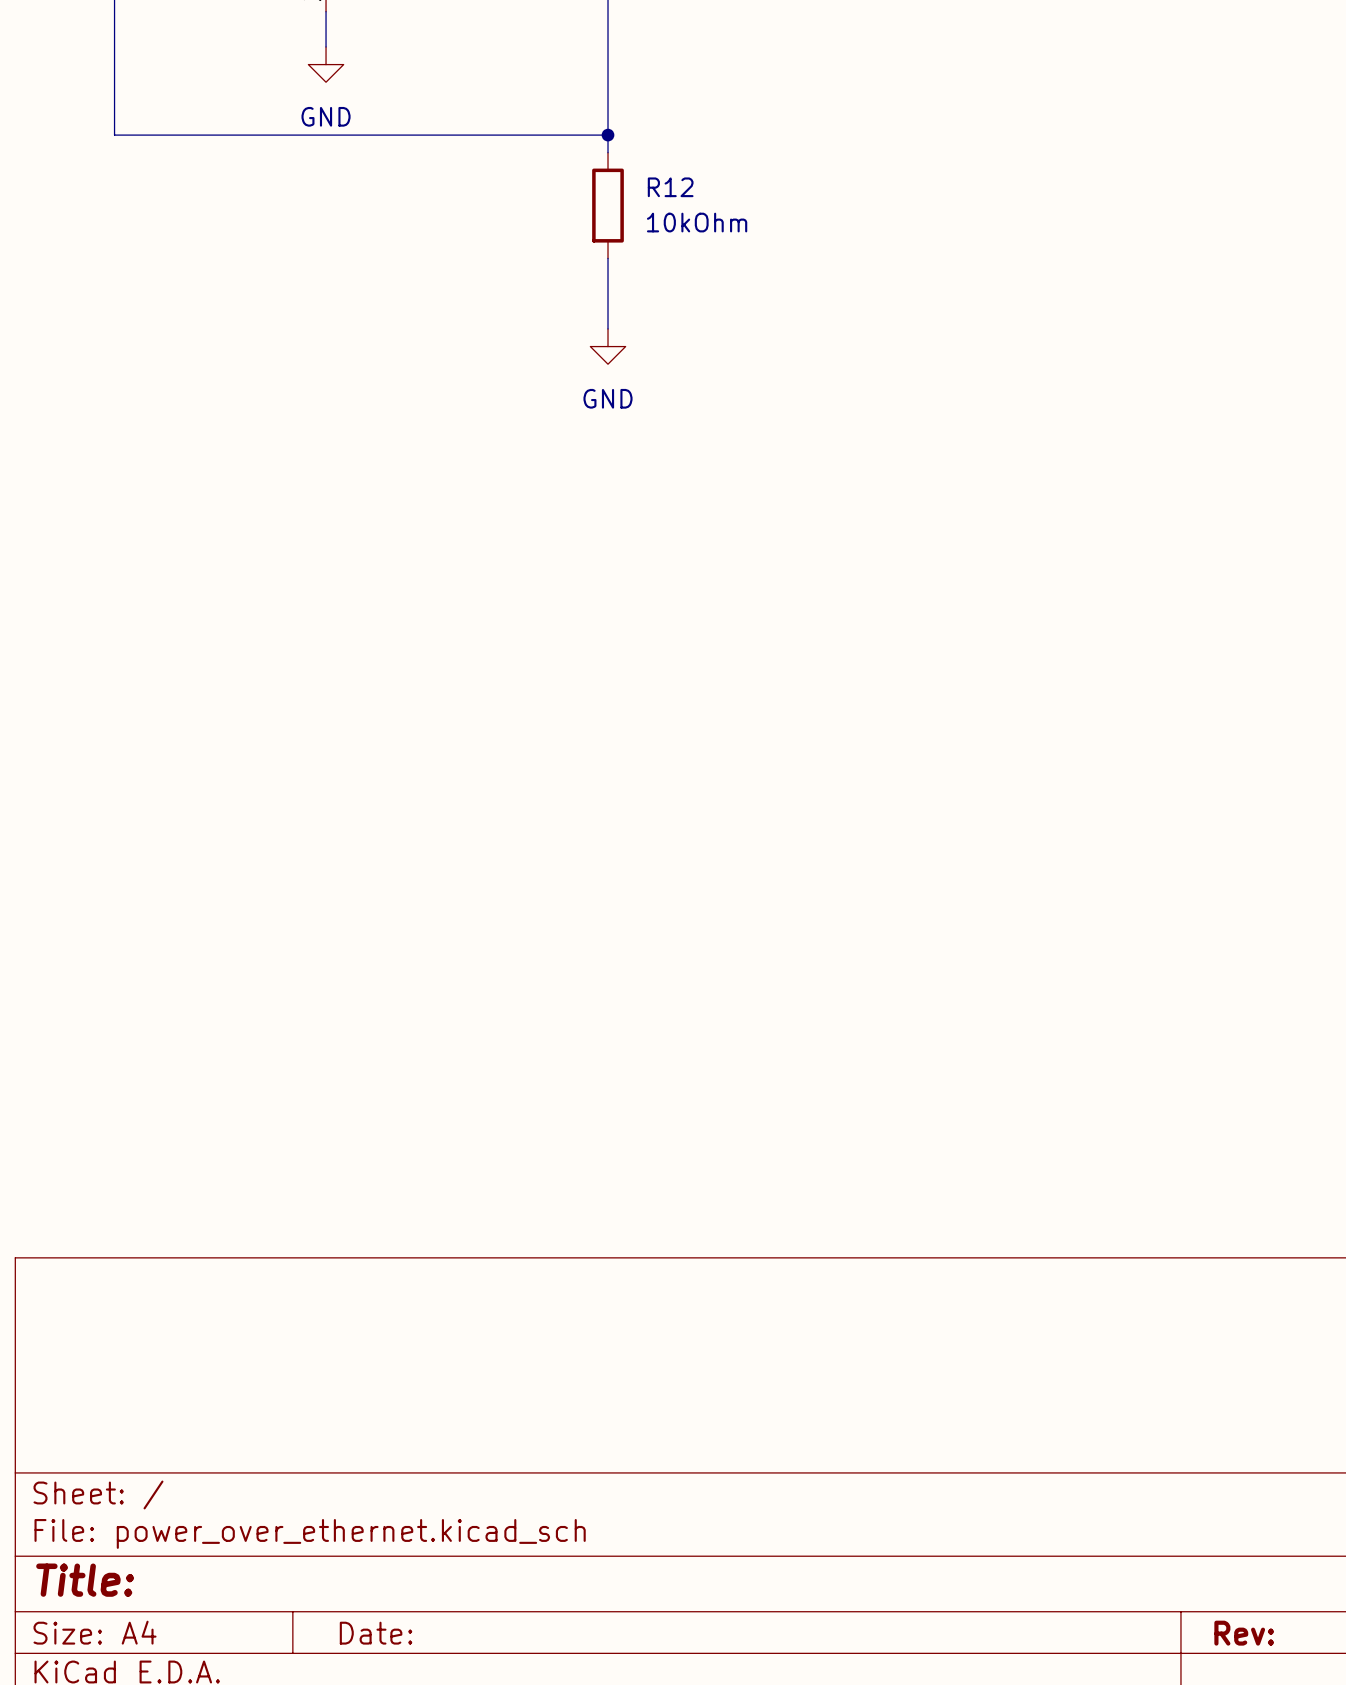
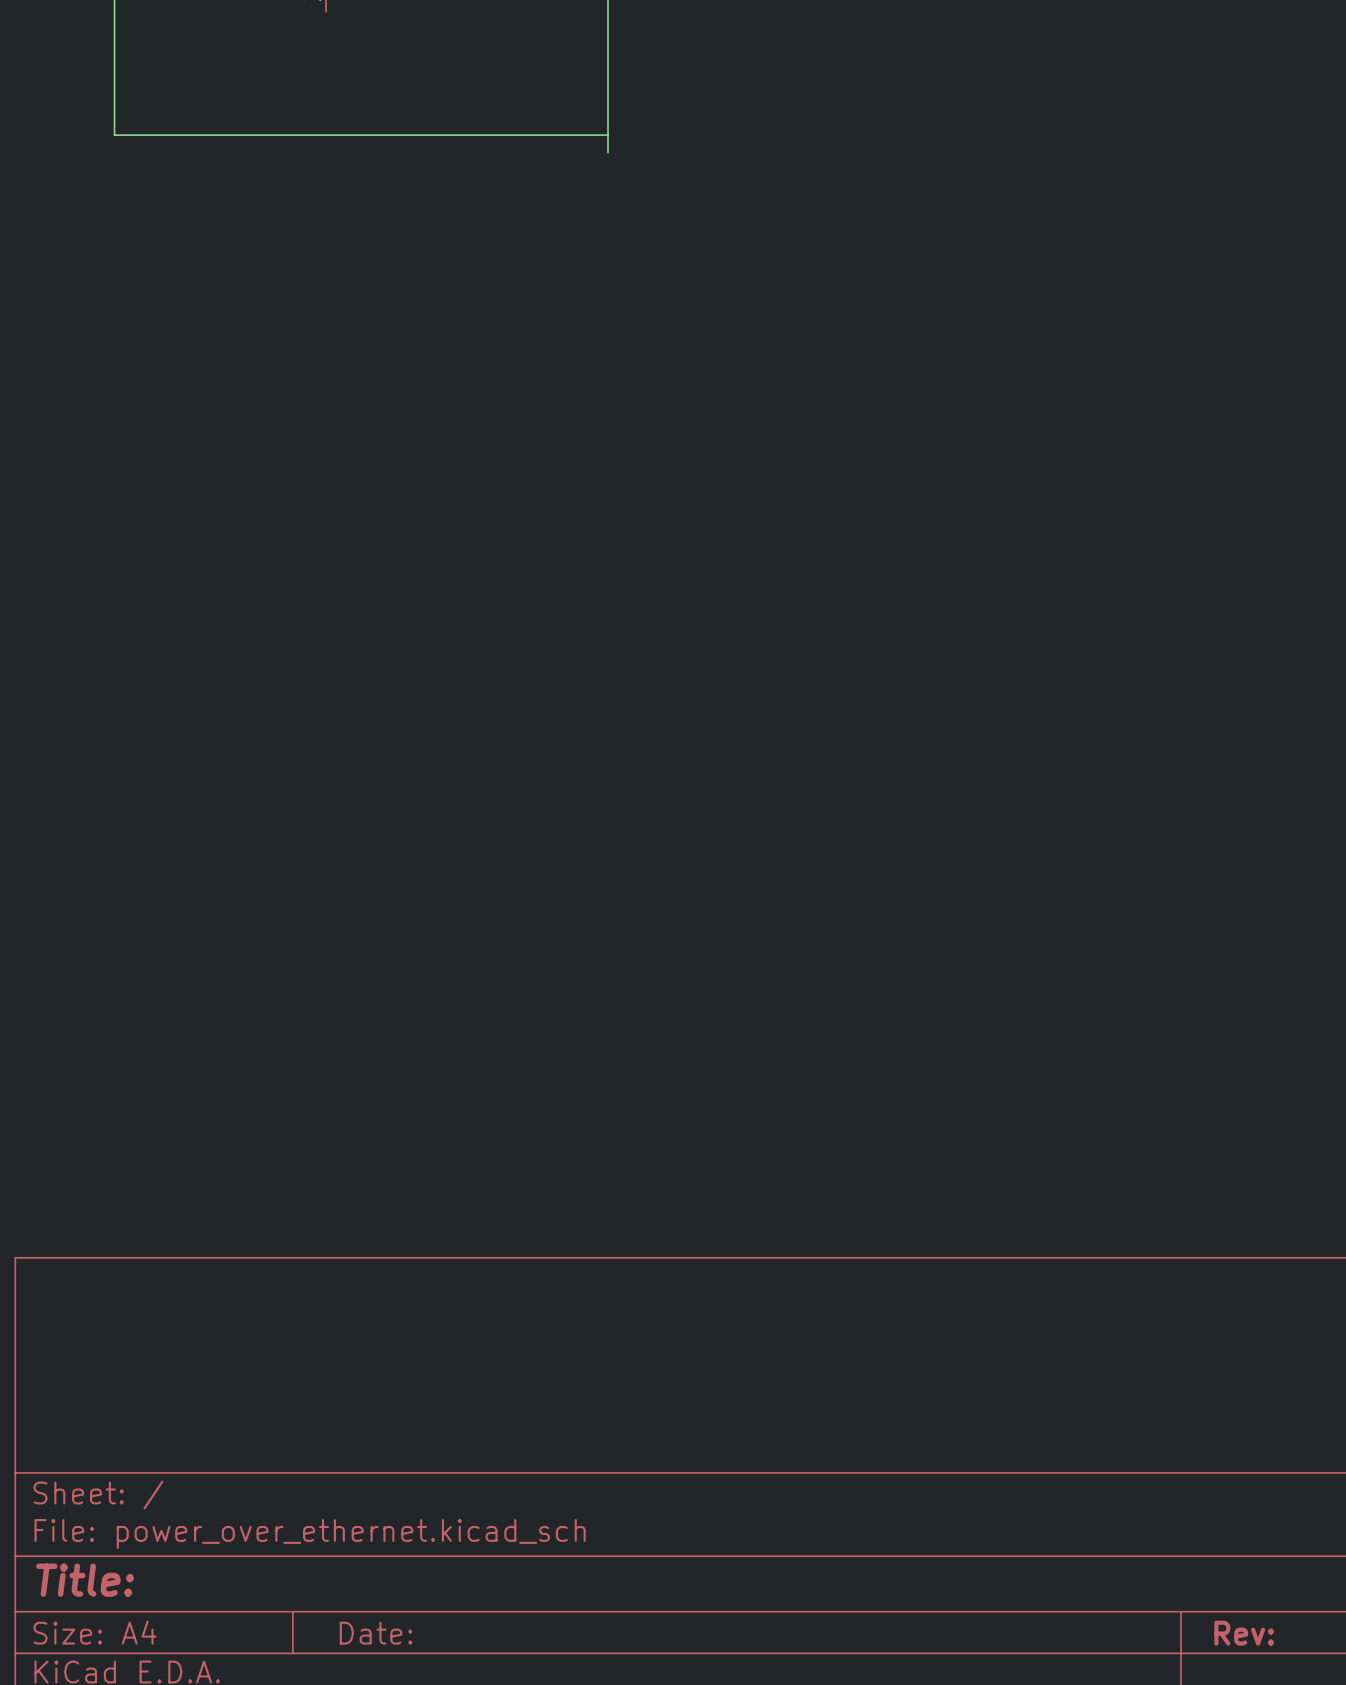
wire: (326, 11) (326, 46) -> none
power symbol: GND (326, 64) -> none
junction: (608, 135) -> none
R12: 10kOhm (608, 205) -> none
wire: (608, 258) (608, 328) -> none
power symbol: GND (608, 346) -> none

